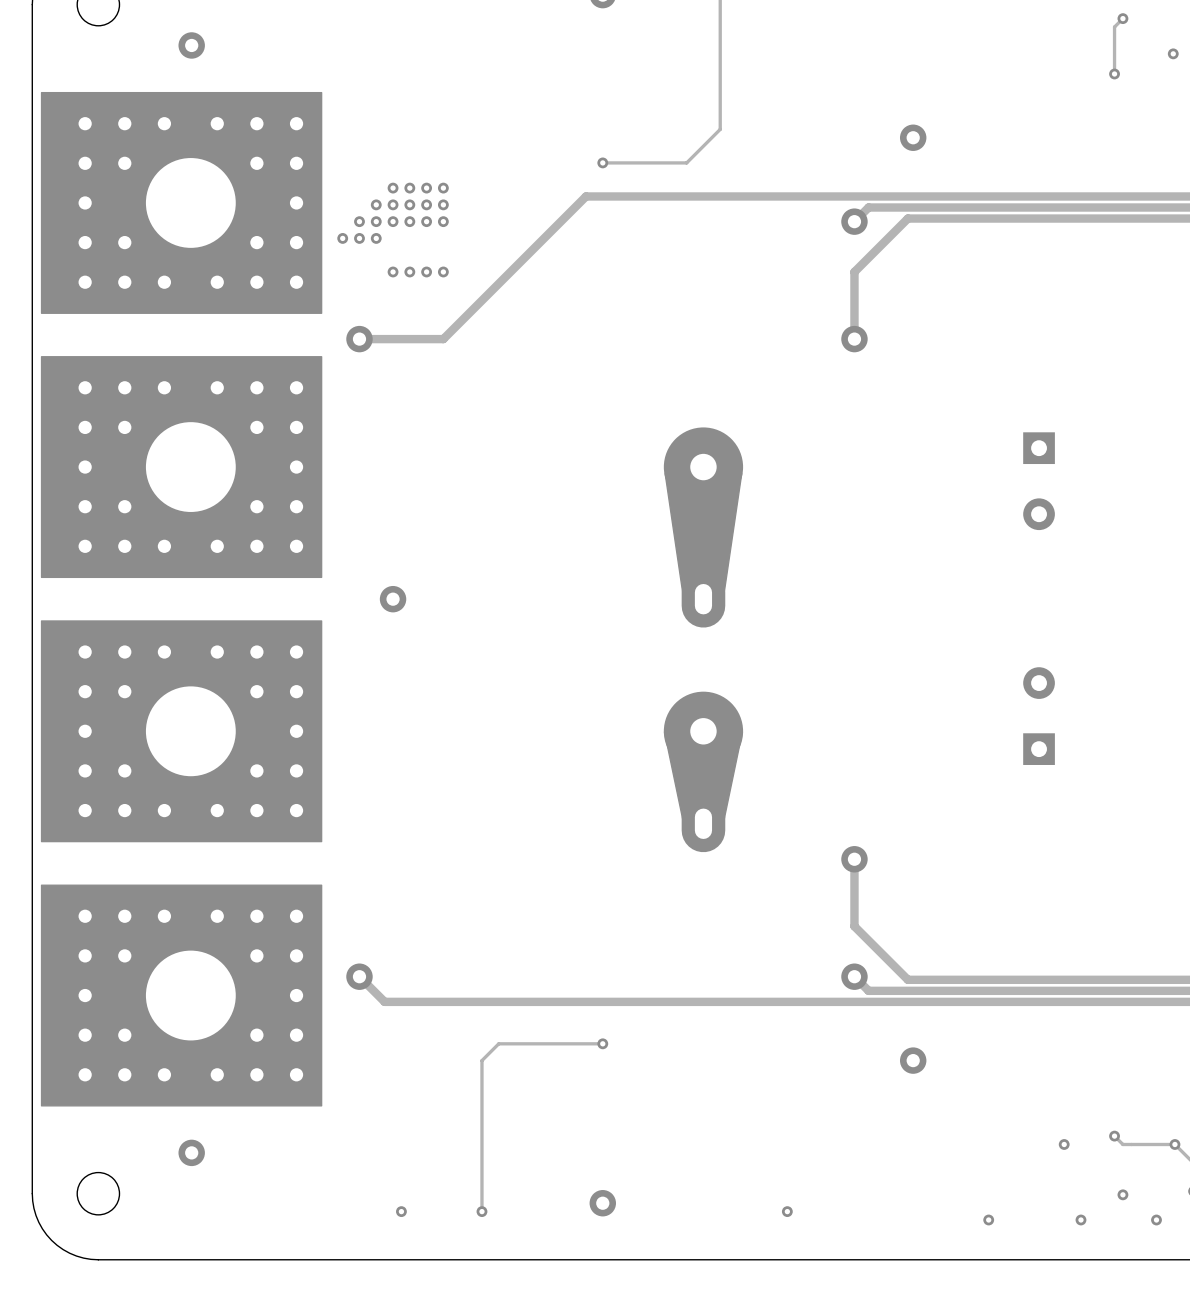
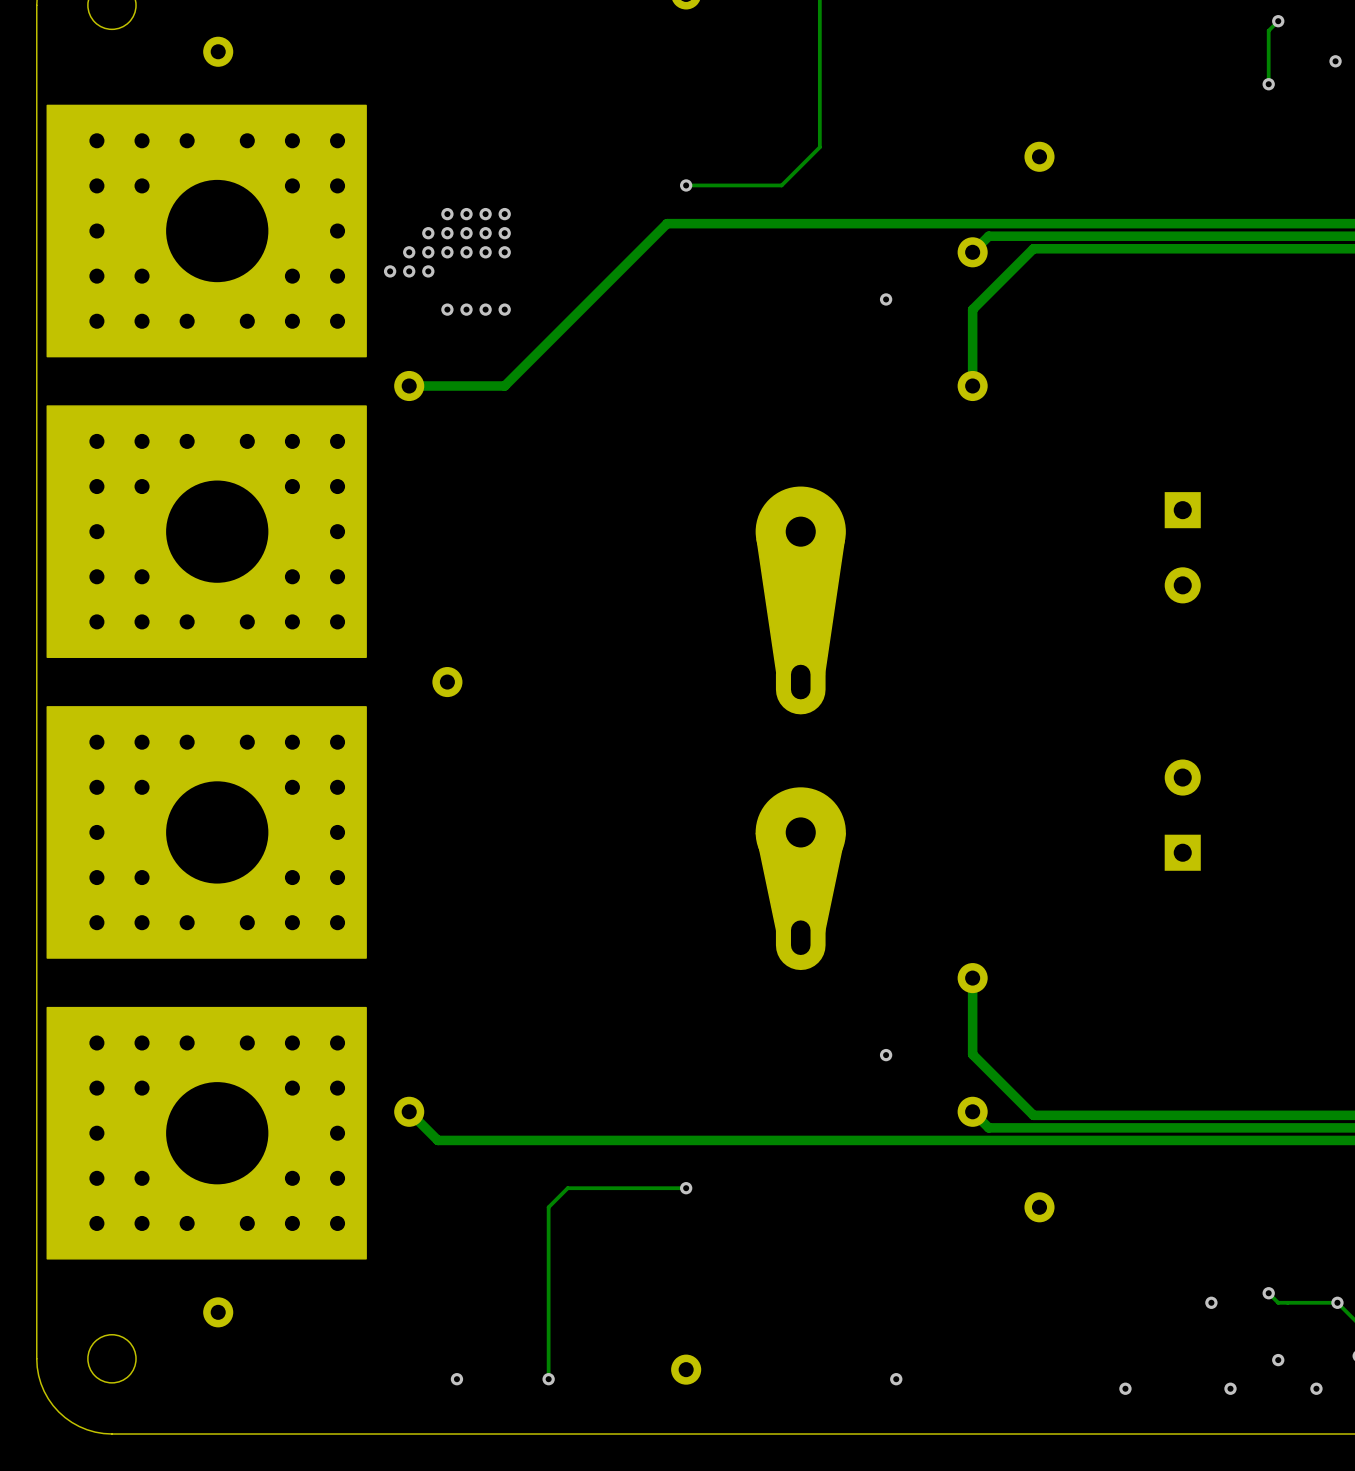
via: none -> (886, 299)
via: none -> (886, 1055)

